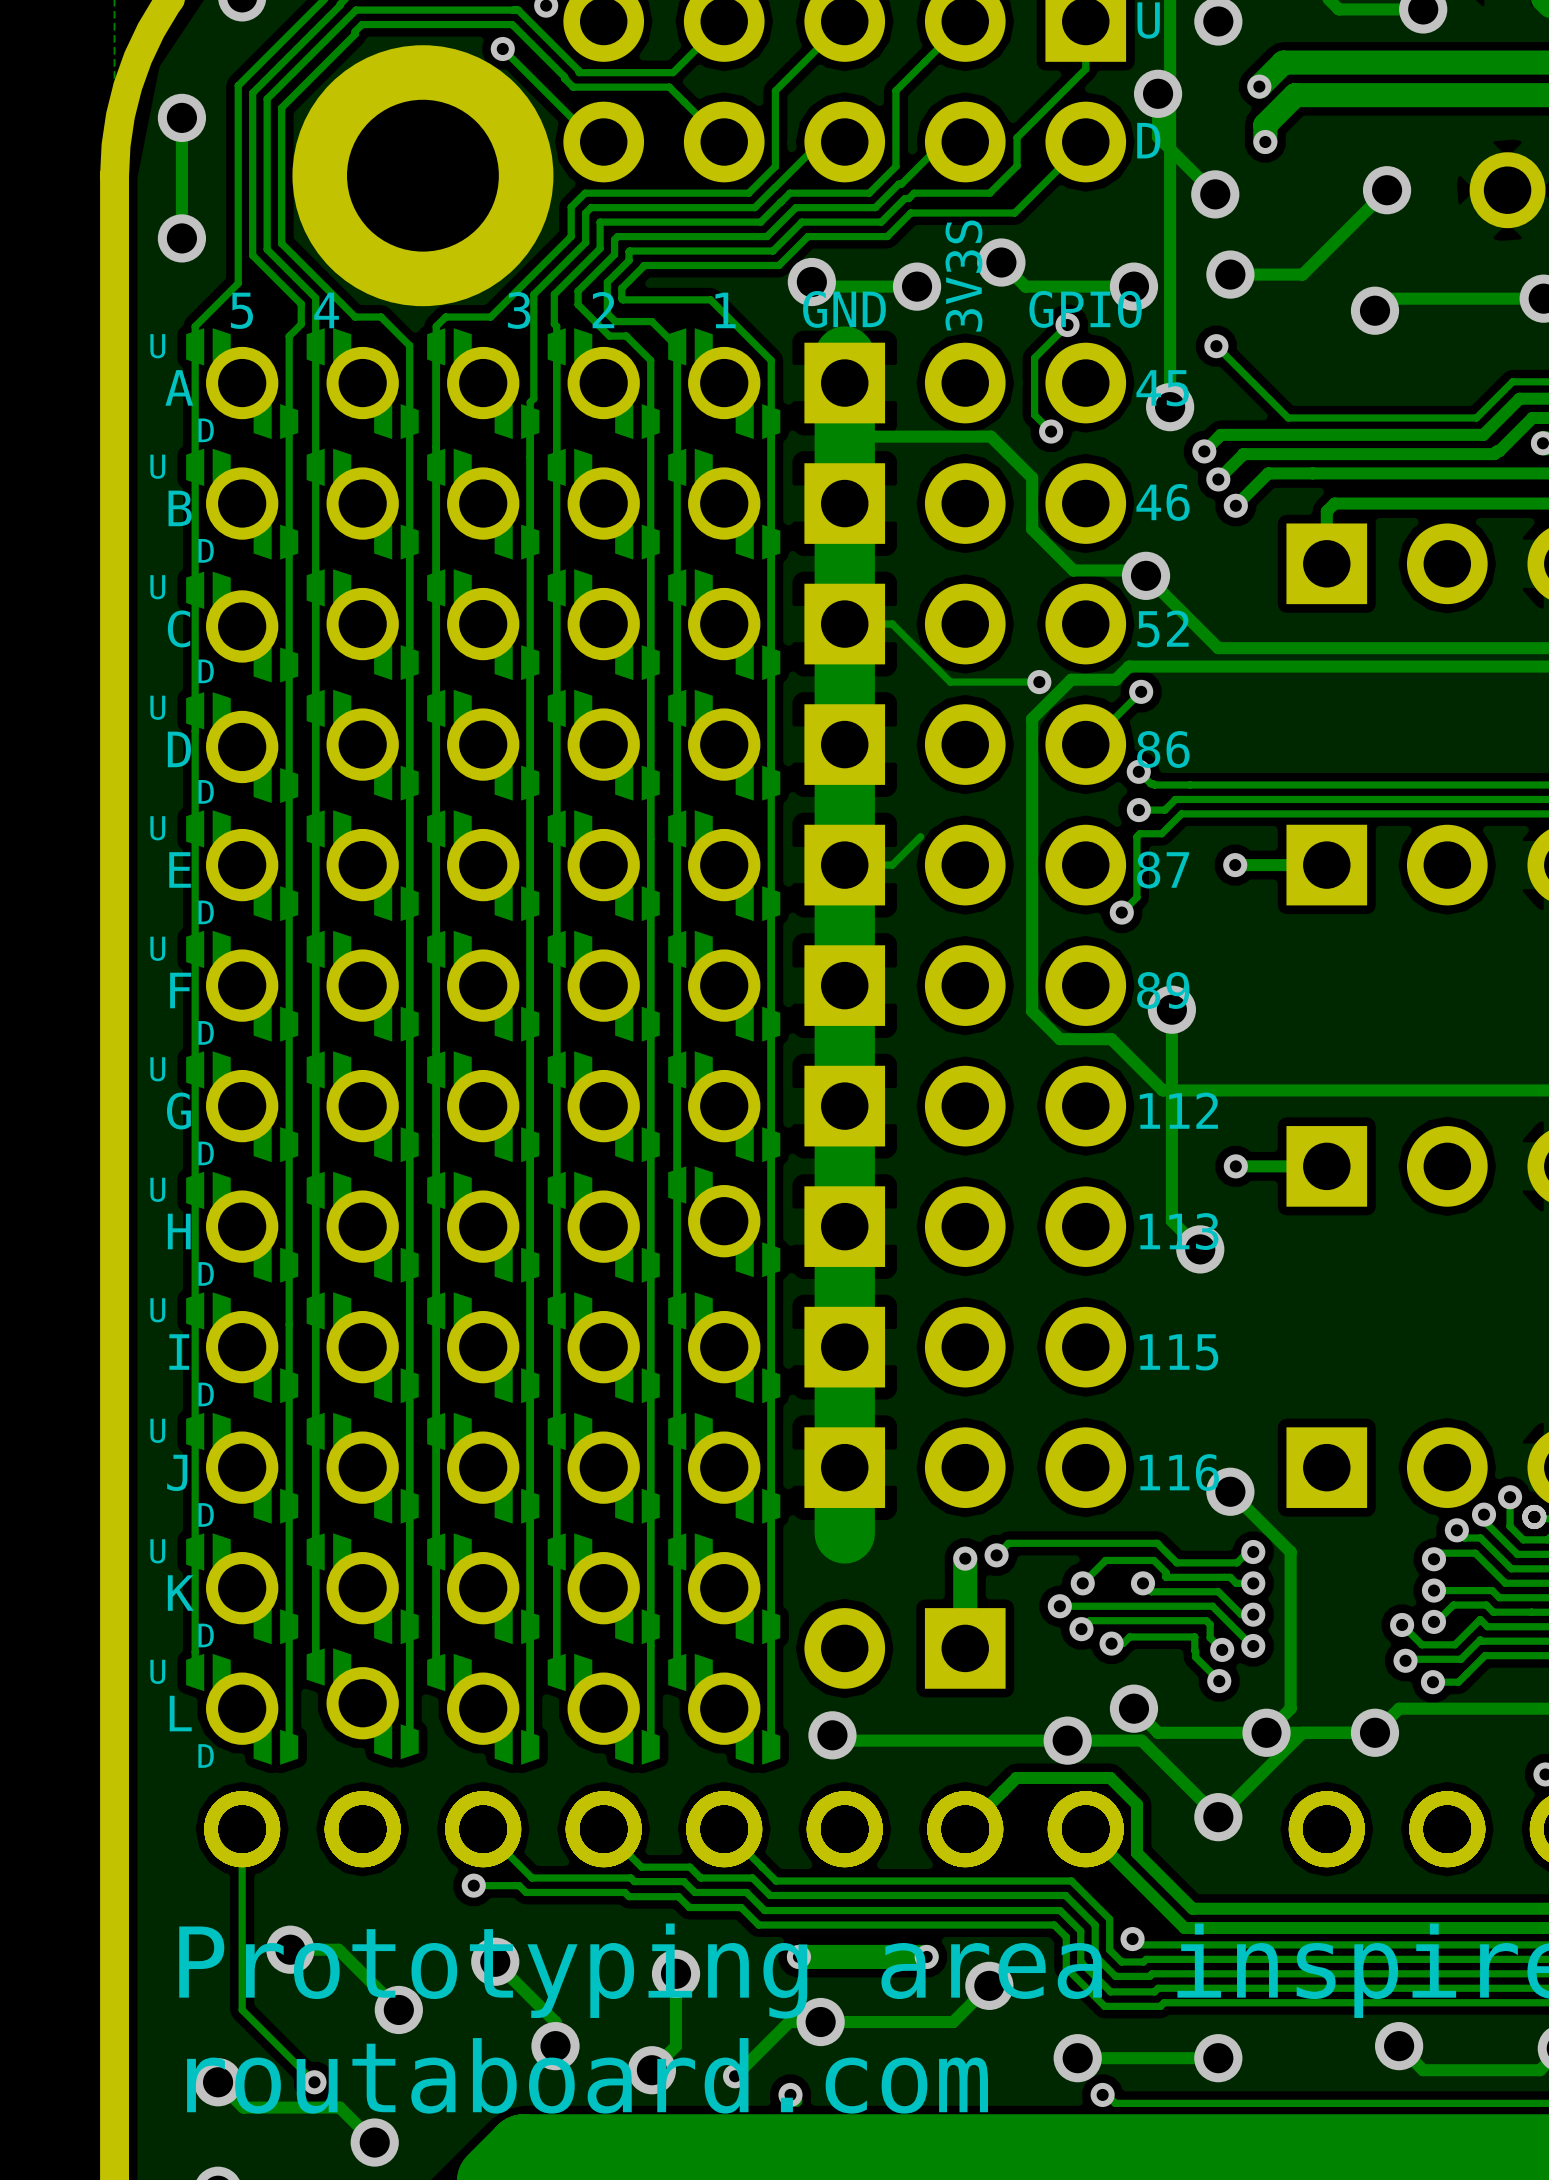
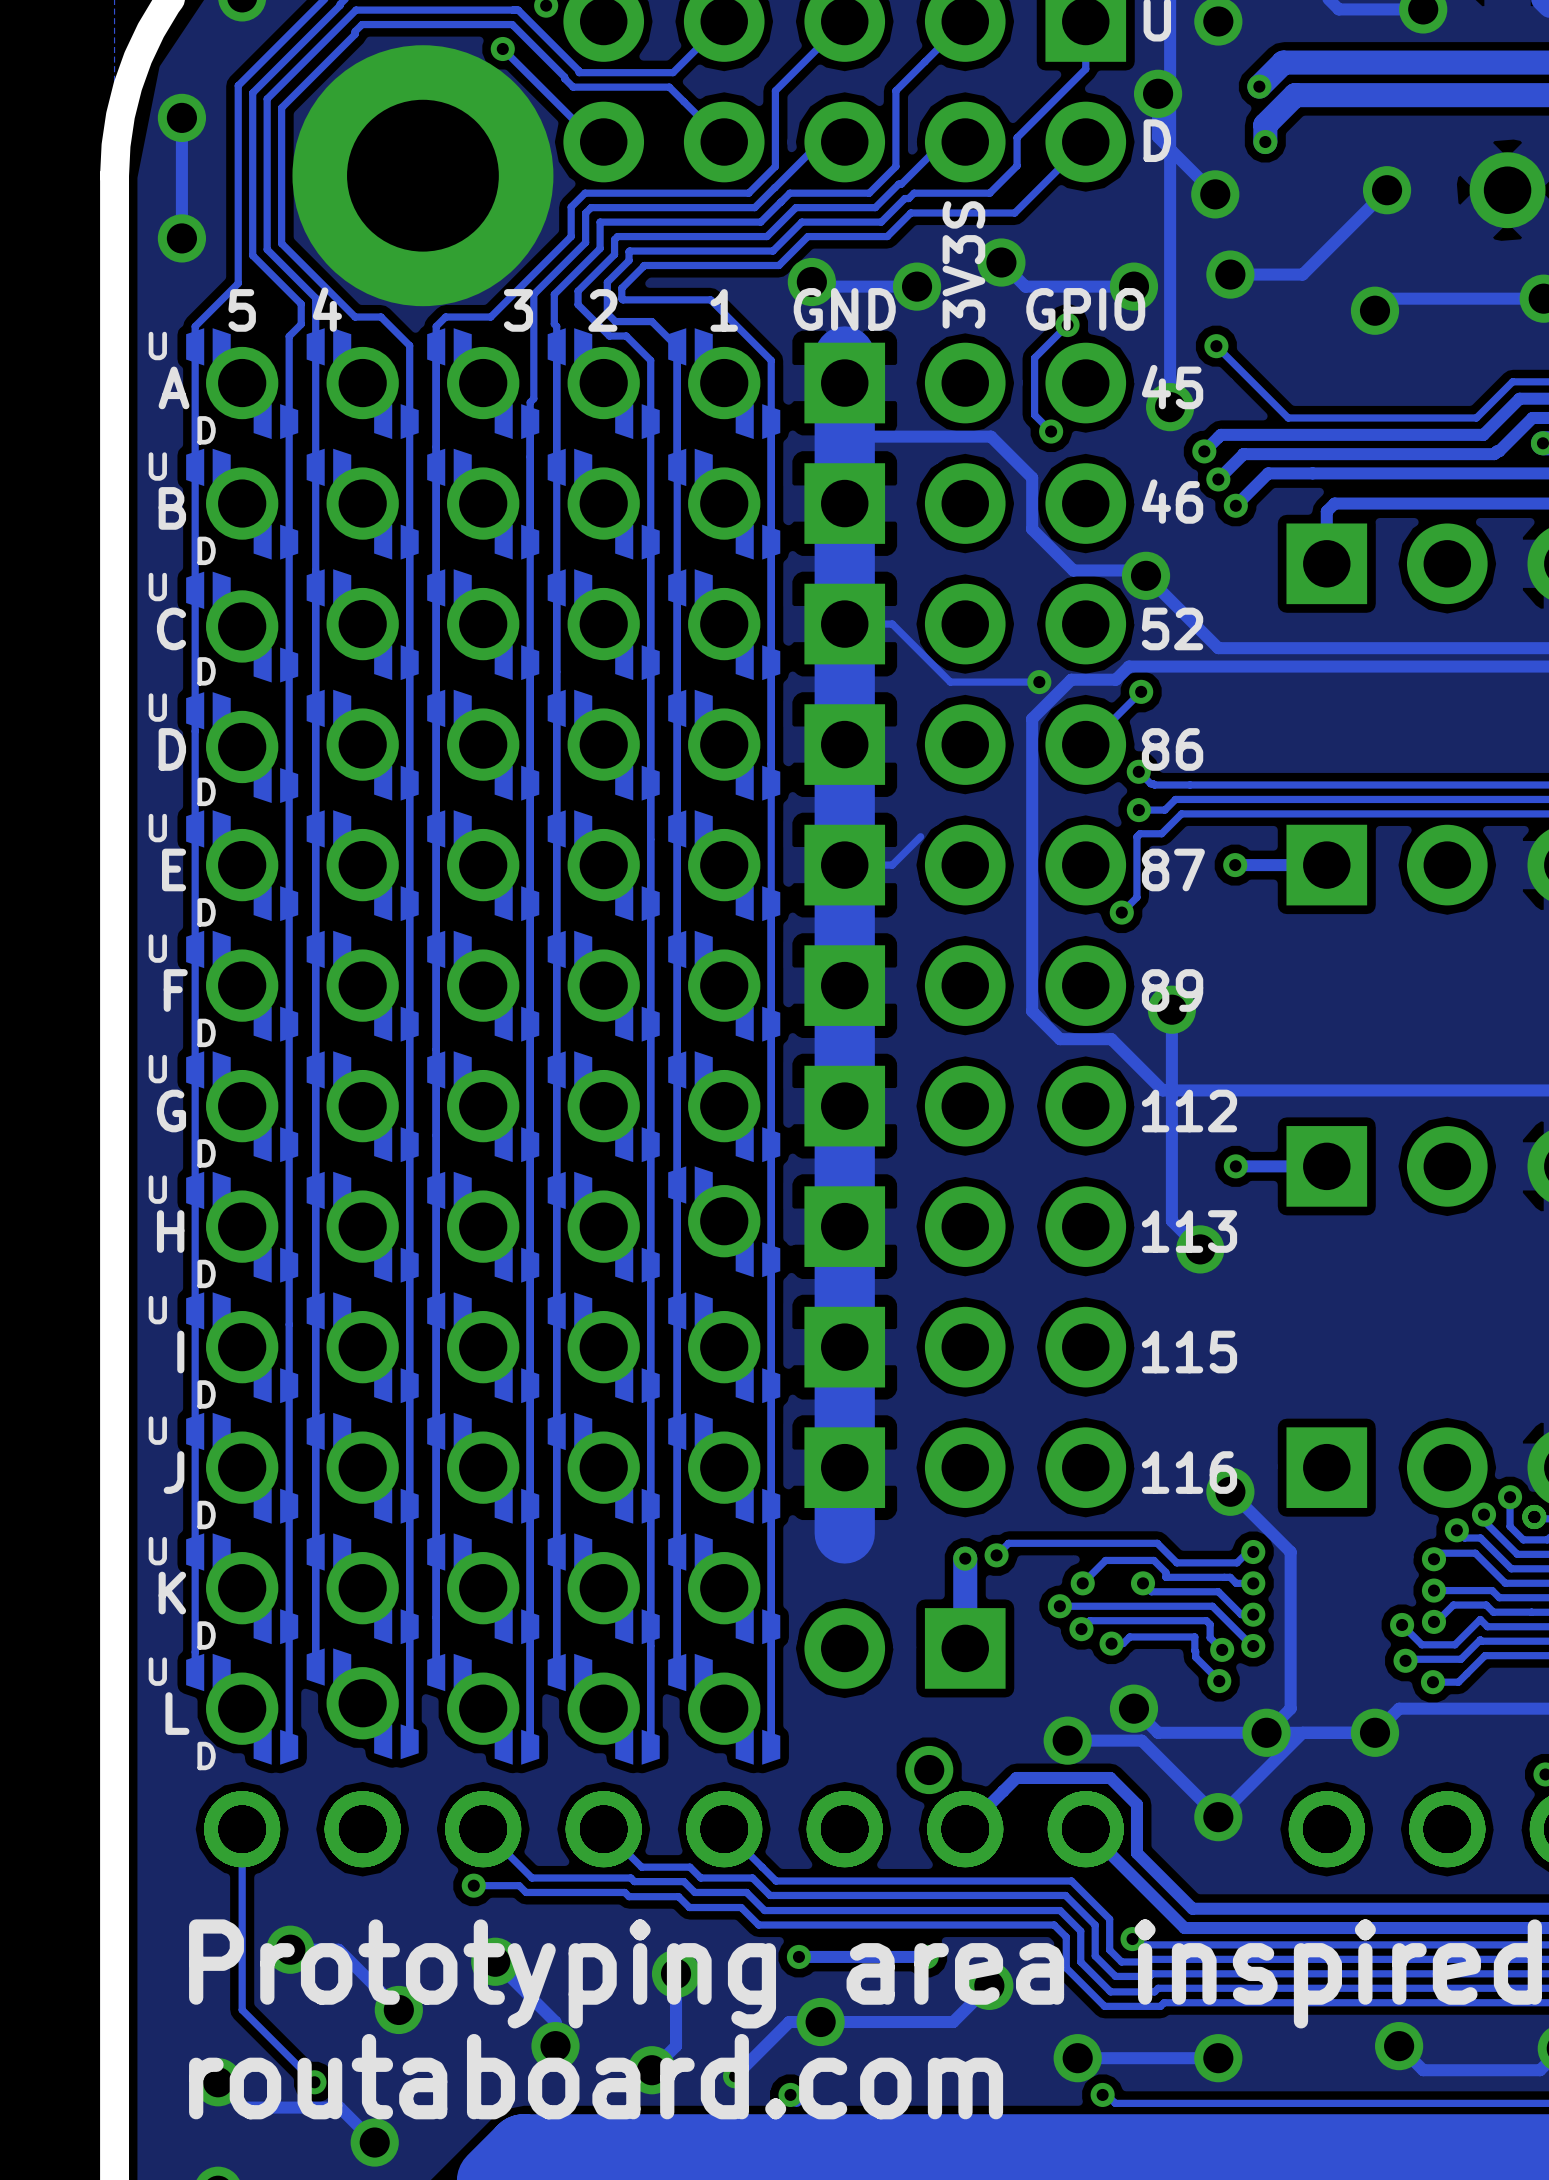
track: (832, 1735) (837, 1740) (1067, 1740) -> none
via position: (832, 1735) -> (929, 1770)
track width: thick (926, 1956) (798, 1956) -> thin (926, 1956) (798, 1956)

